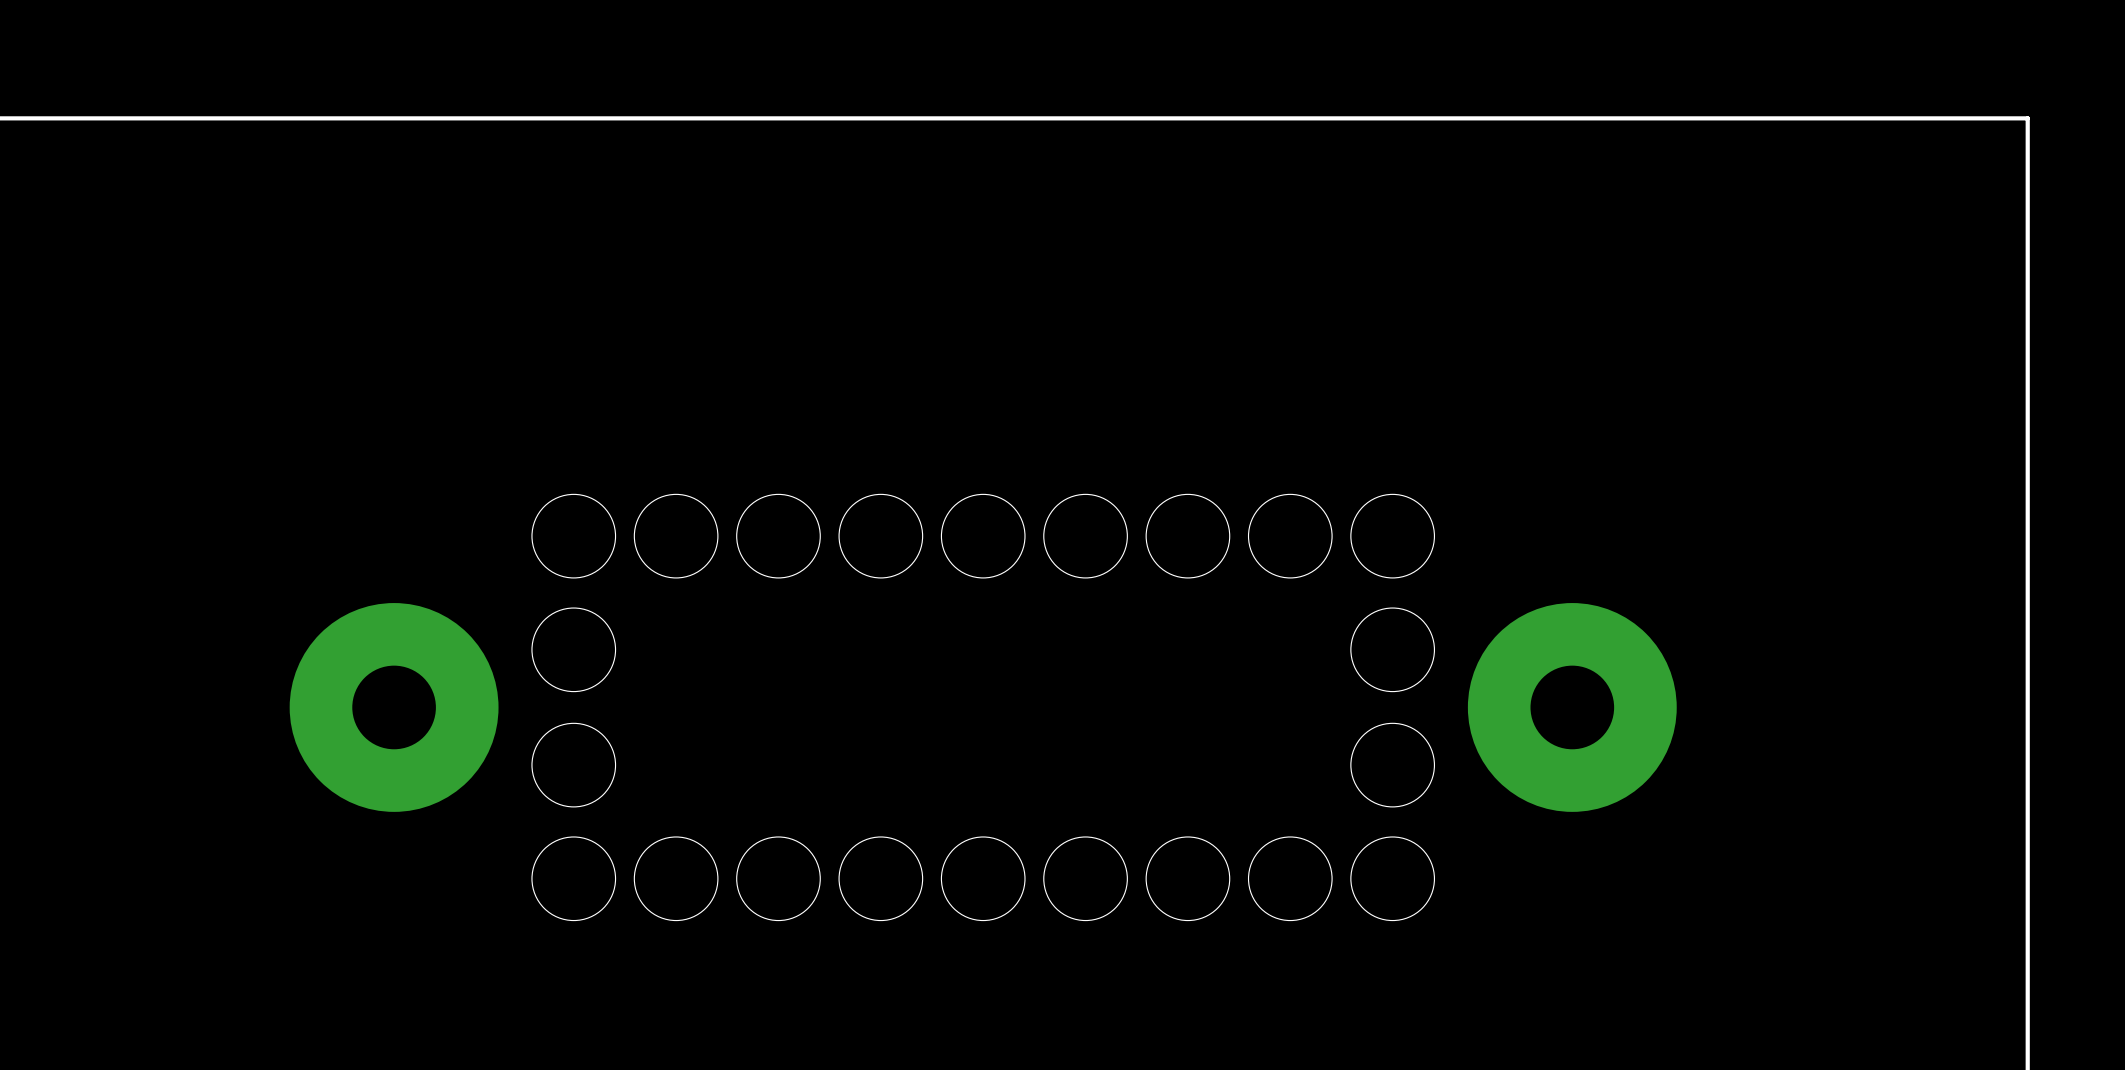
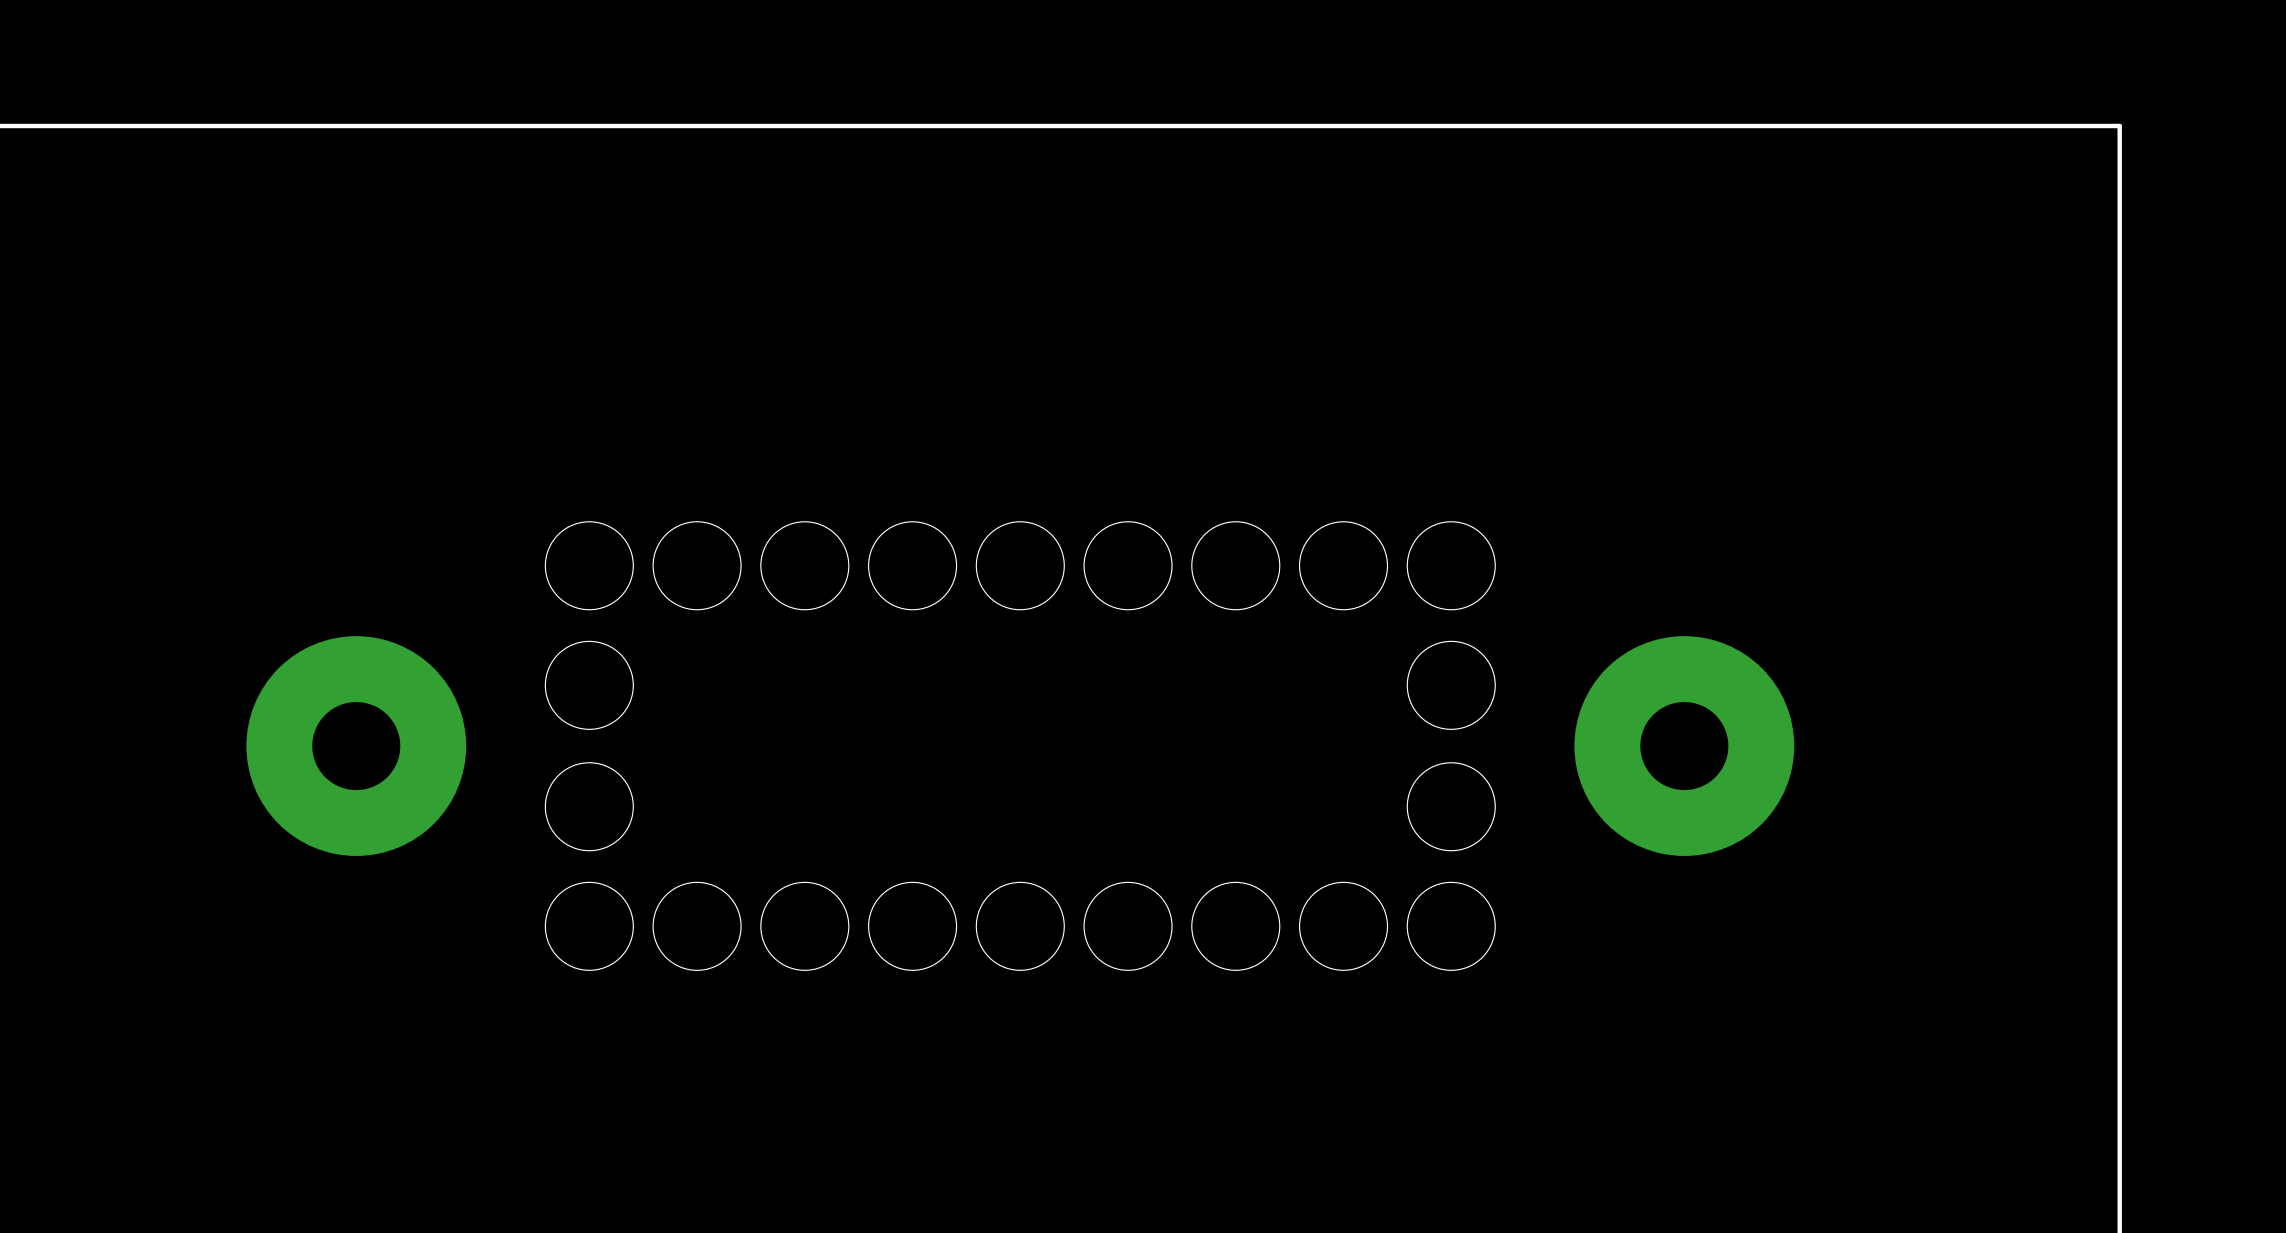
part position: (394, 707) -> (356, 746)
part position: (1572, 707) -> (1684, 746)

